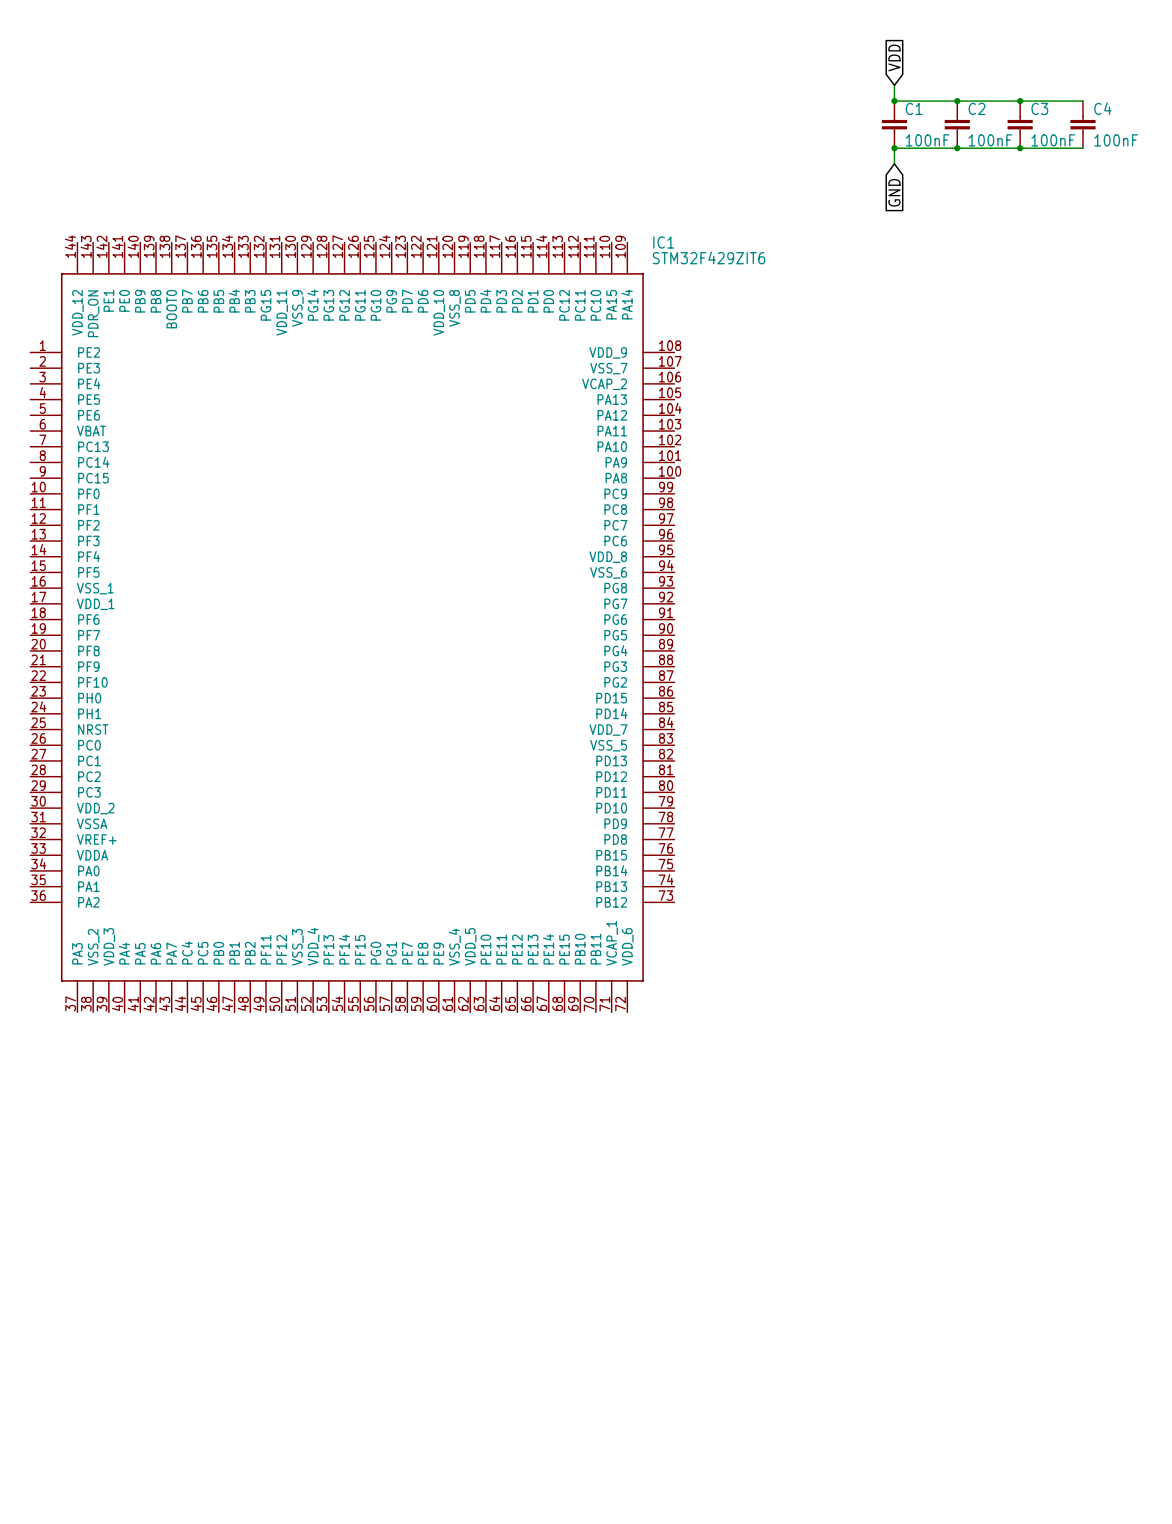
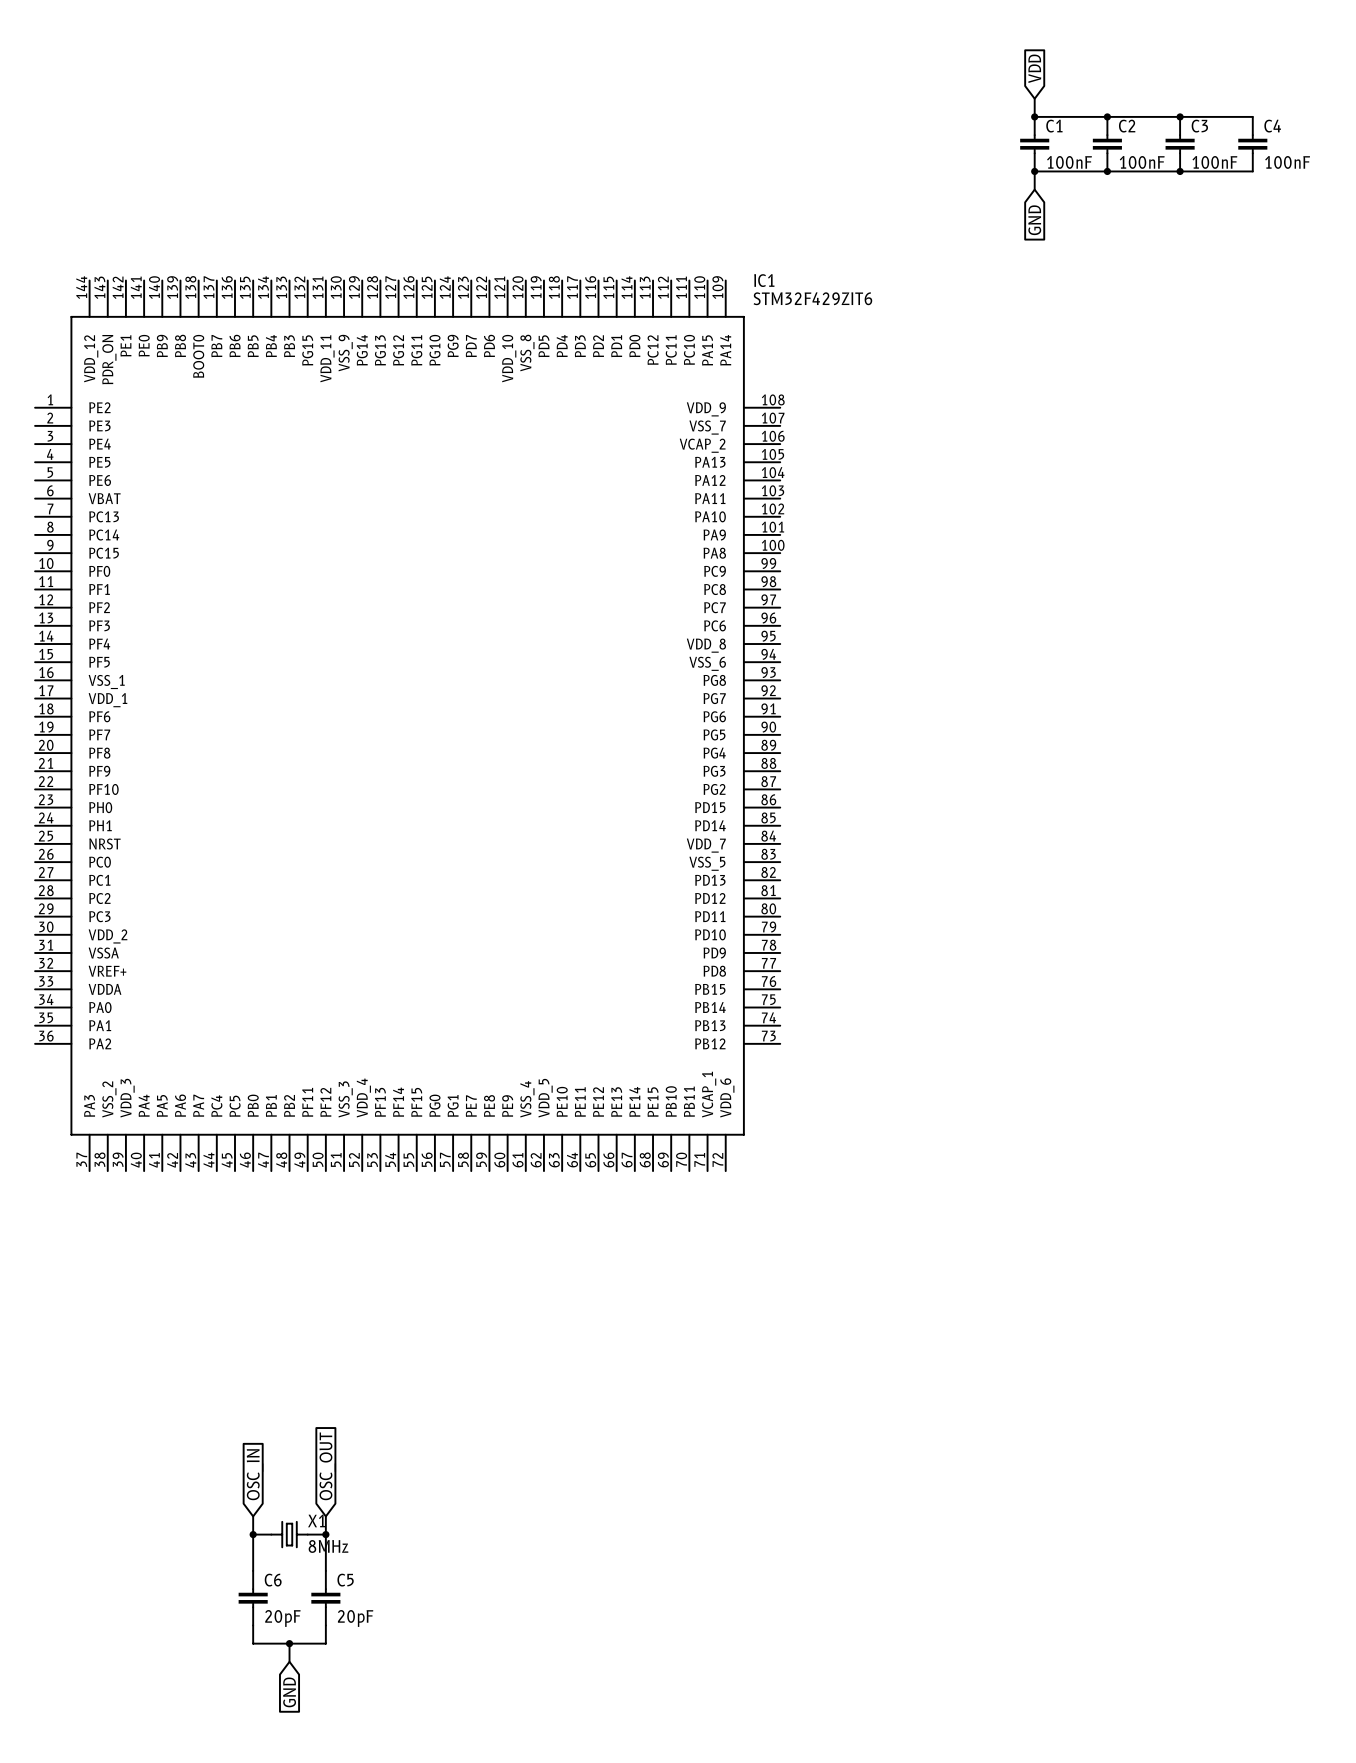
global label: none -> OSC_OUT (327, 1466)
global label: none -> OSC_IN (255, 1474)
wire: none -> (253, 1516) (253, 1570)
wire: none -> (325, 1516) (325, 1570)
wire: none -> (253, 1534) (271, 1534)
junction: none -> (253, 1534)
X1: none -> 8MHz (289, 1534)
wire: none -> (307, 1534) (325, 1534)
junction: none -> (325, 1534)
C6: none -> 20pF (253, 1598)
C5: none -> 20pF (325, 1598)
wire: none -> (253, 1625) (253, 1643) (325, 1643) (325, 1625)
wire: none -> (289, 1643) (289, 1661)
junction: none -> (289, 1643)
global label: none -> GND (289, 1692)

